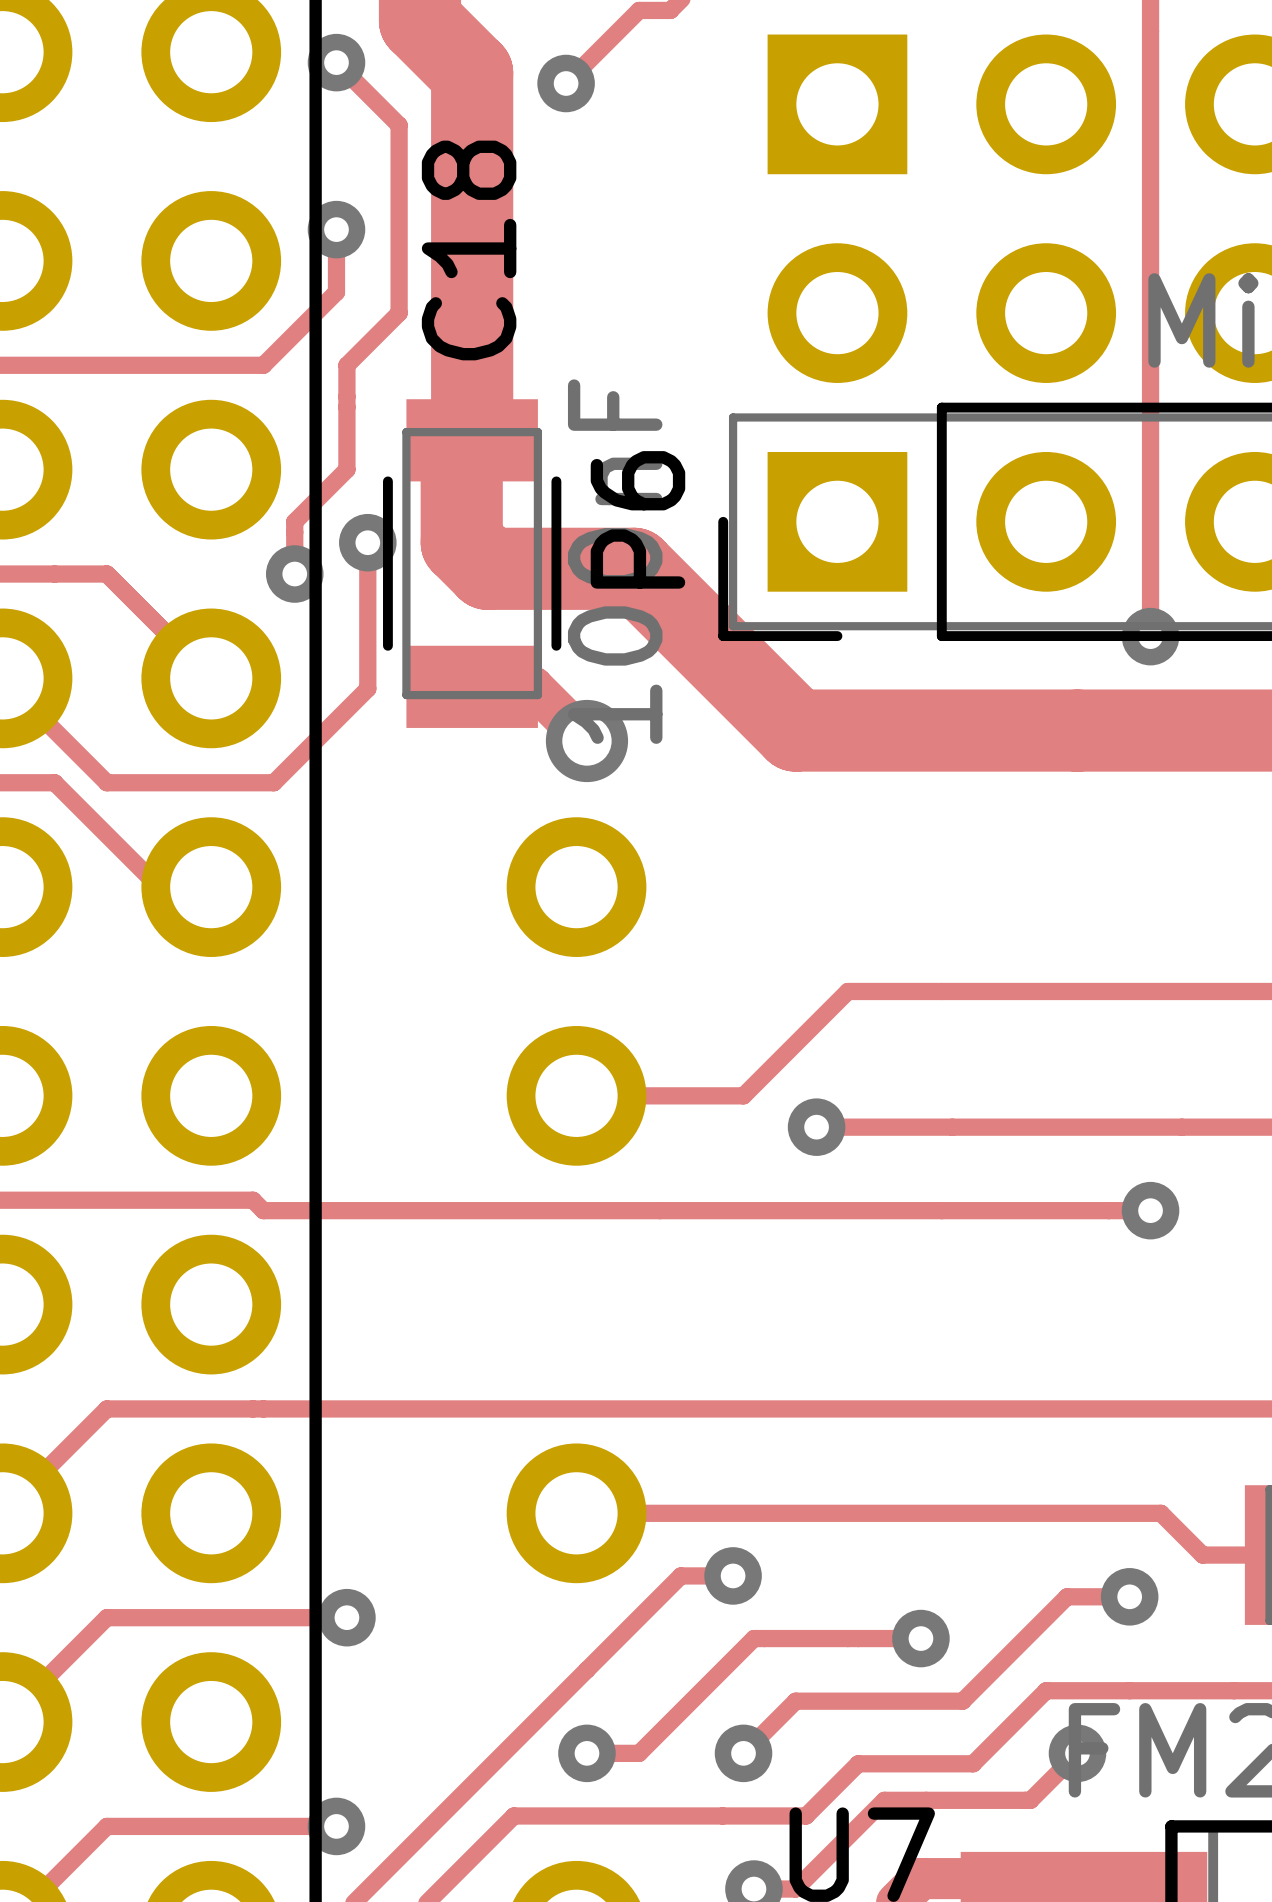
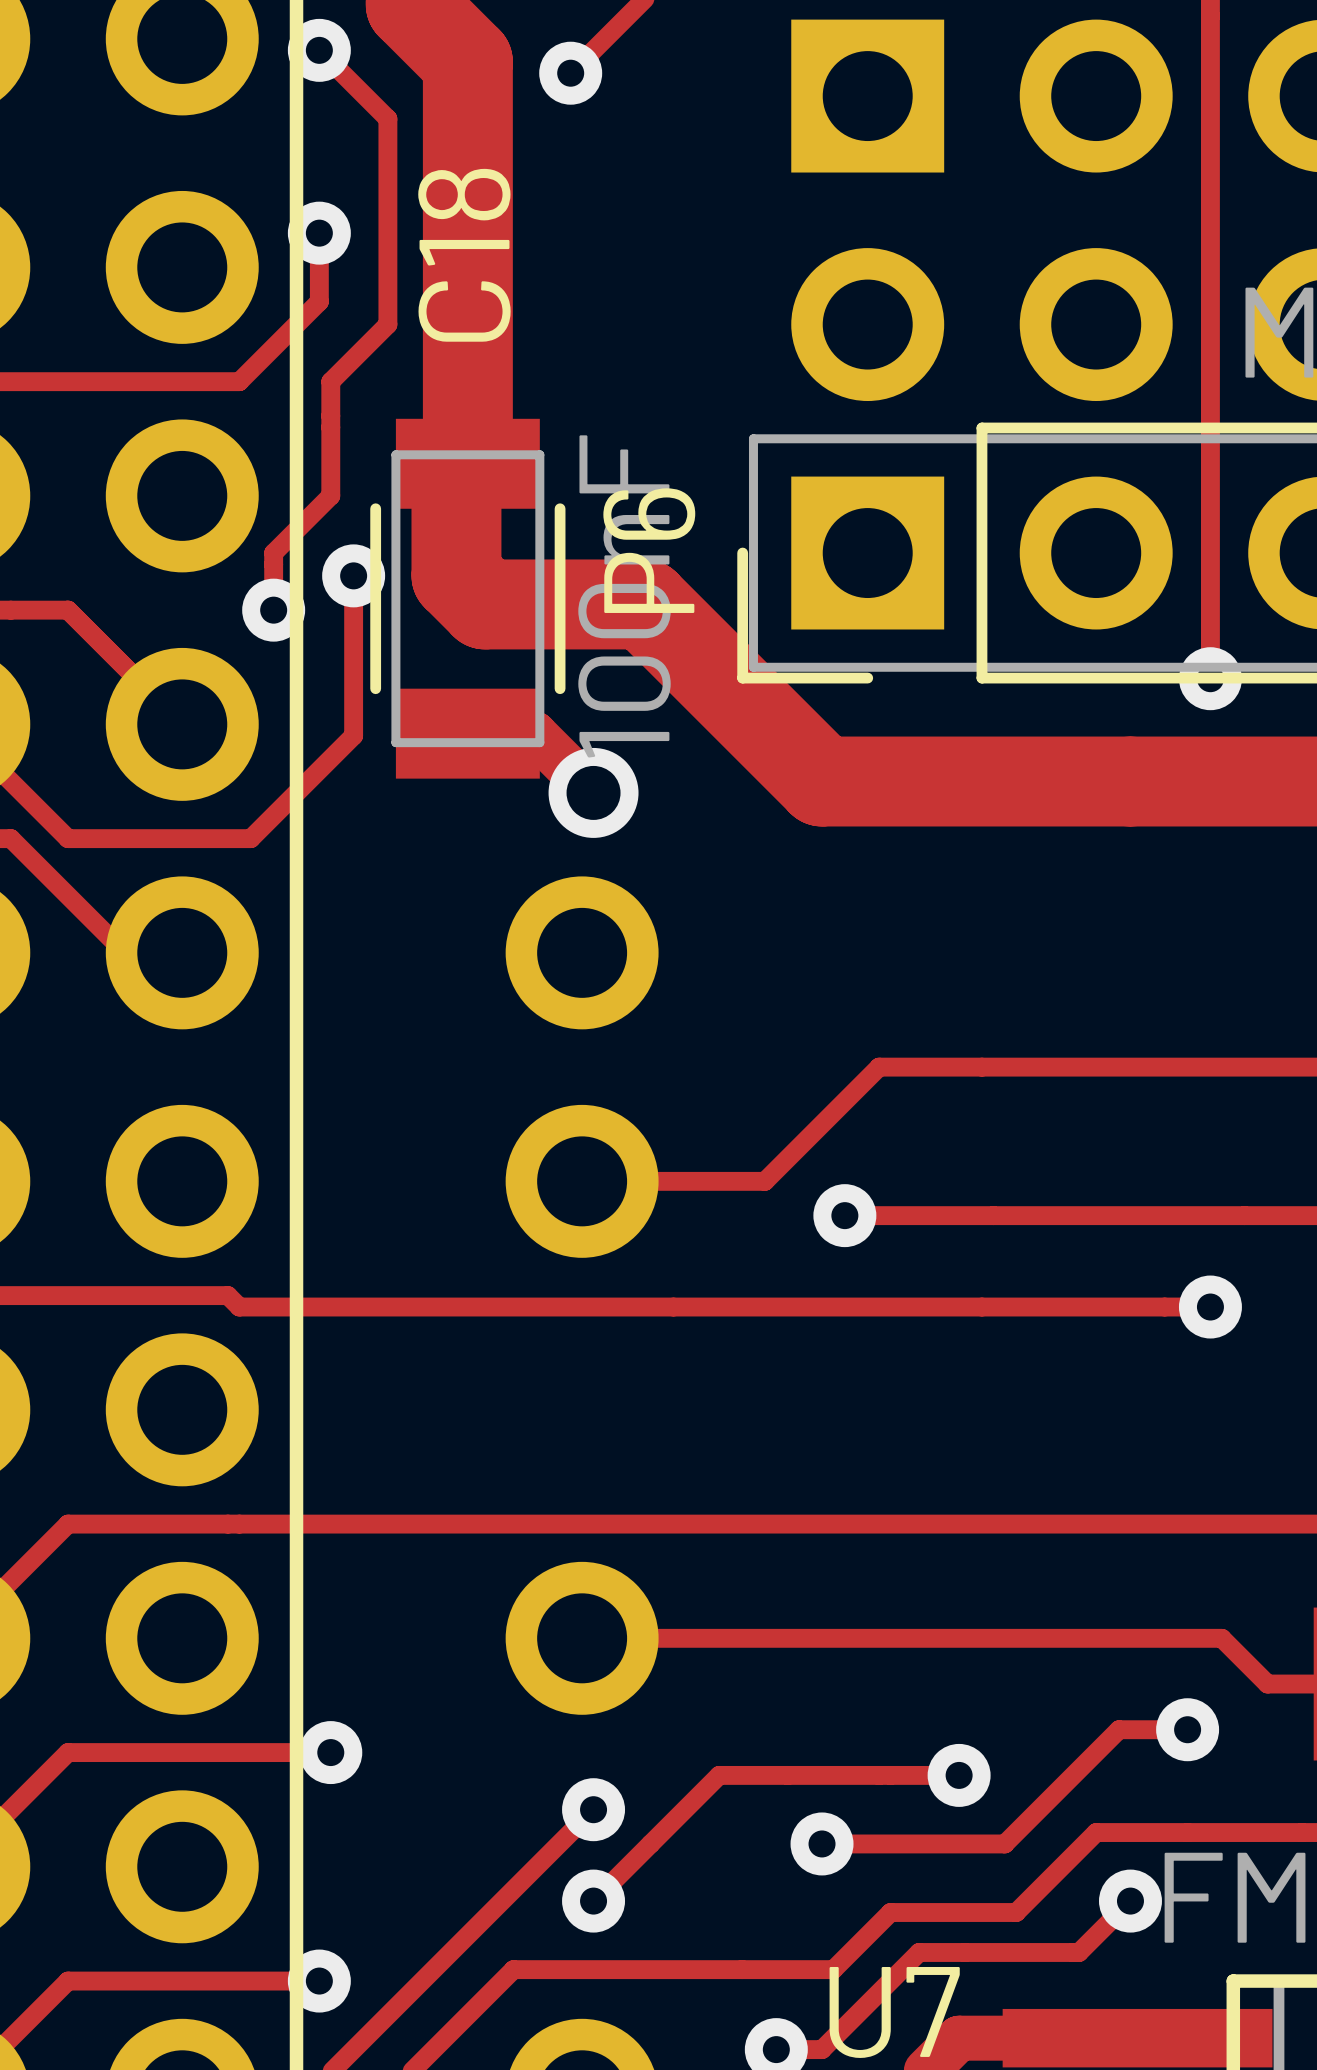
track: (733, 1575) (680, 1575) (586, 1669) -> none
via: (733, 1575) -> none
track: (753, 1638) (639, 1753) (586, 1753) -> (776, 1775) (719, 1775) (593, 1901)
via: none -> (593, 1809)
track: (795, 1701) (743, 1753) -> none
via position: (743, 1753) -> (822, 1843)

